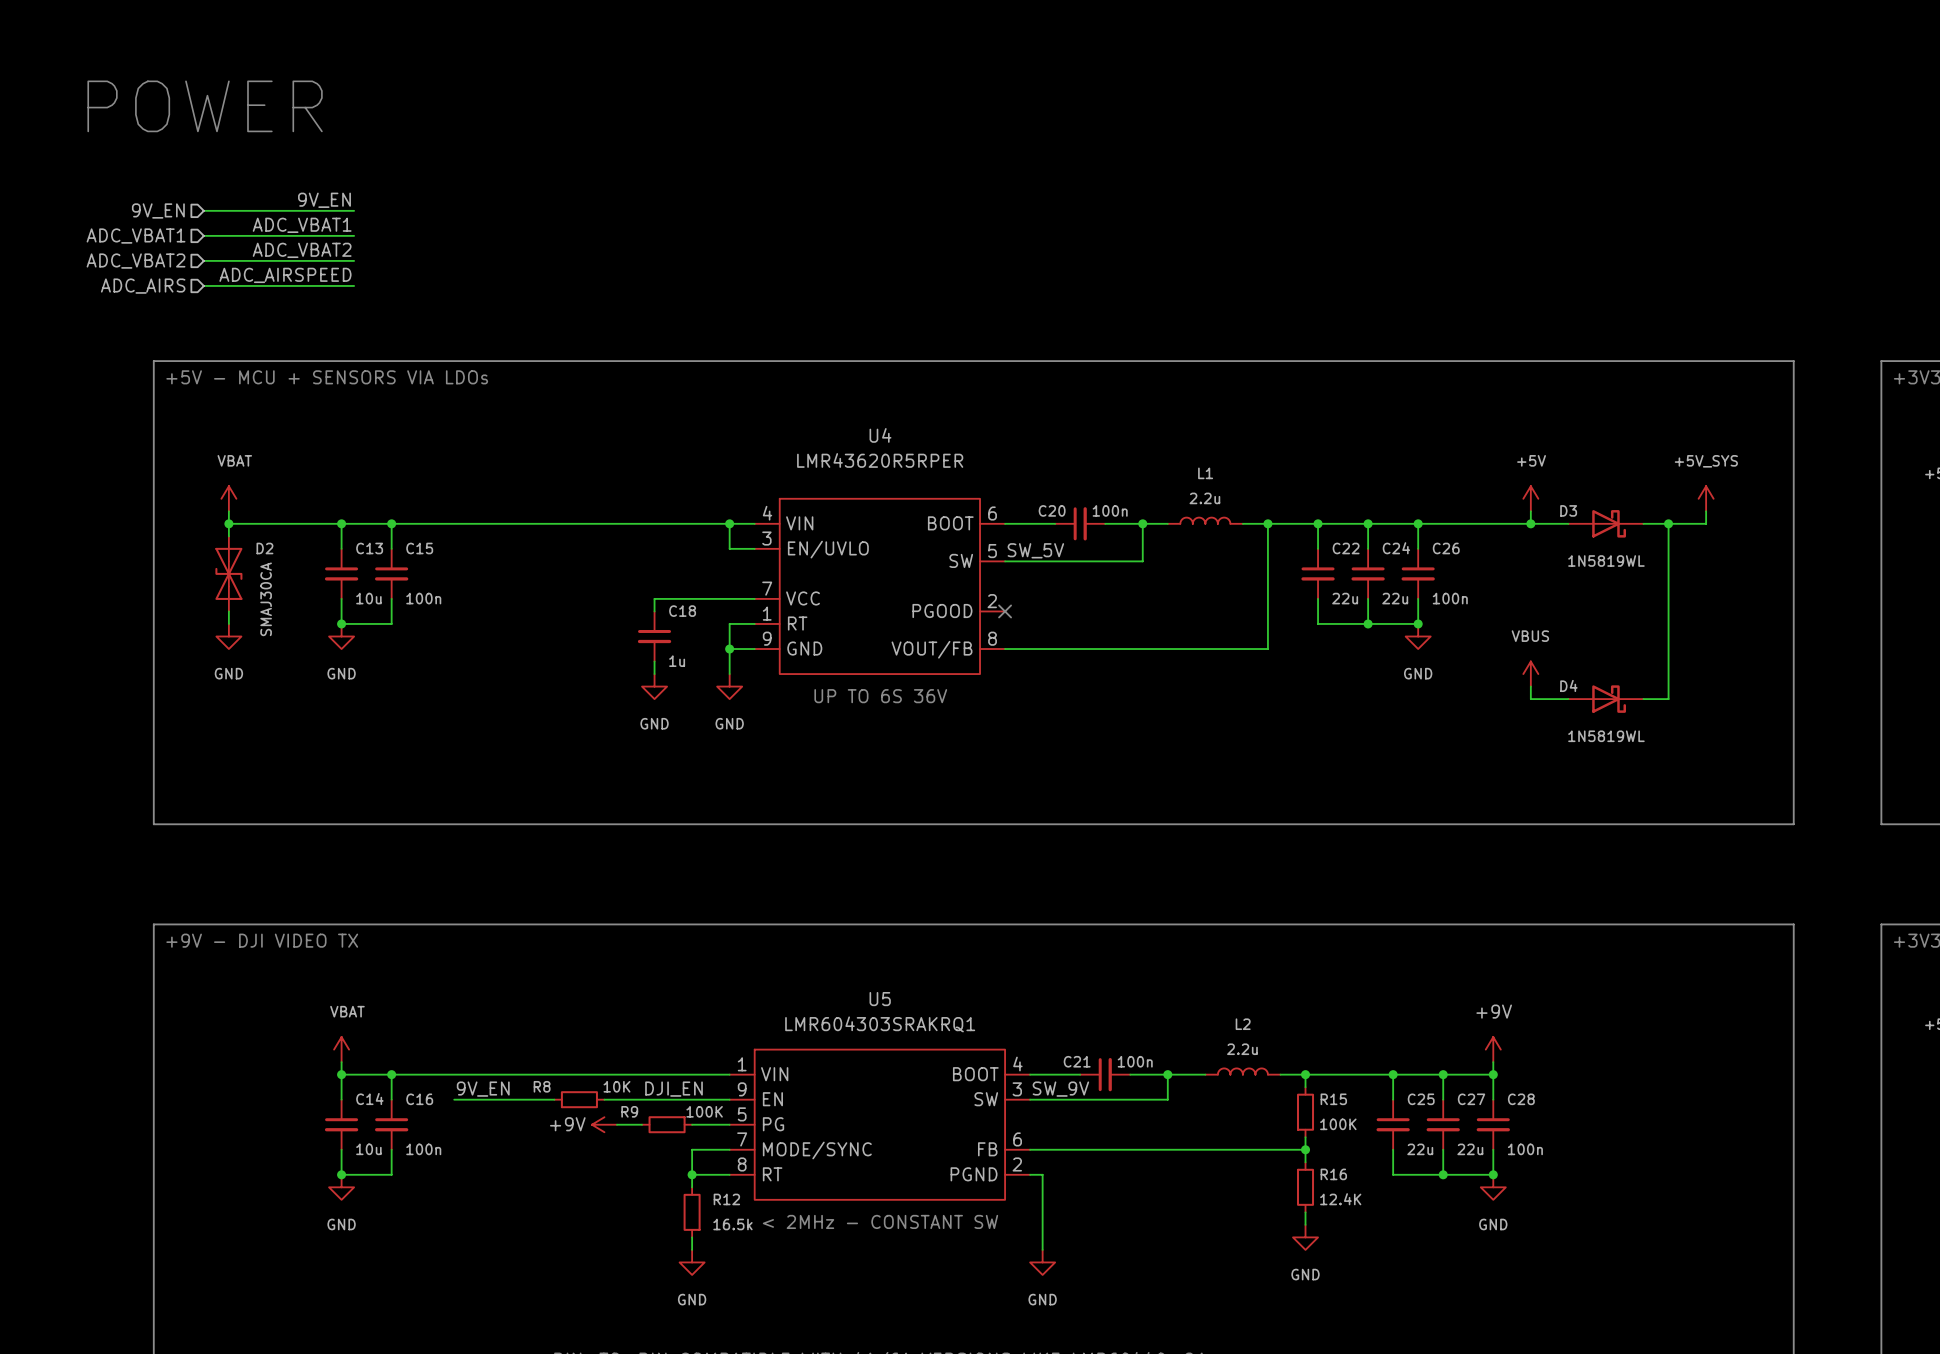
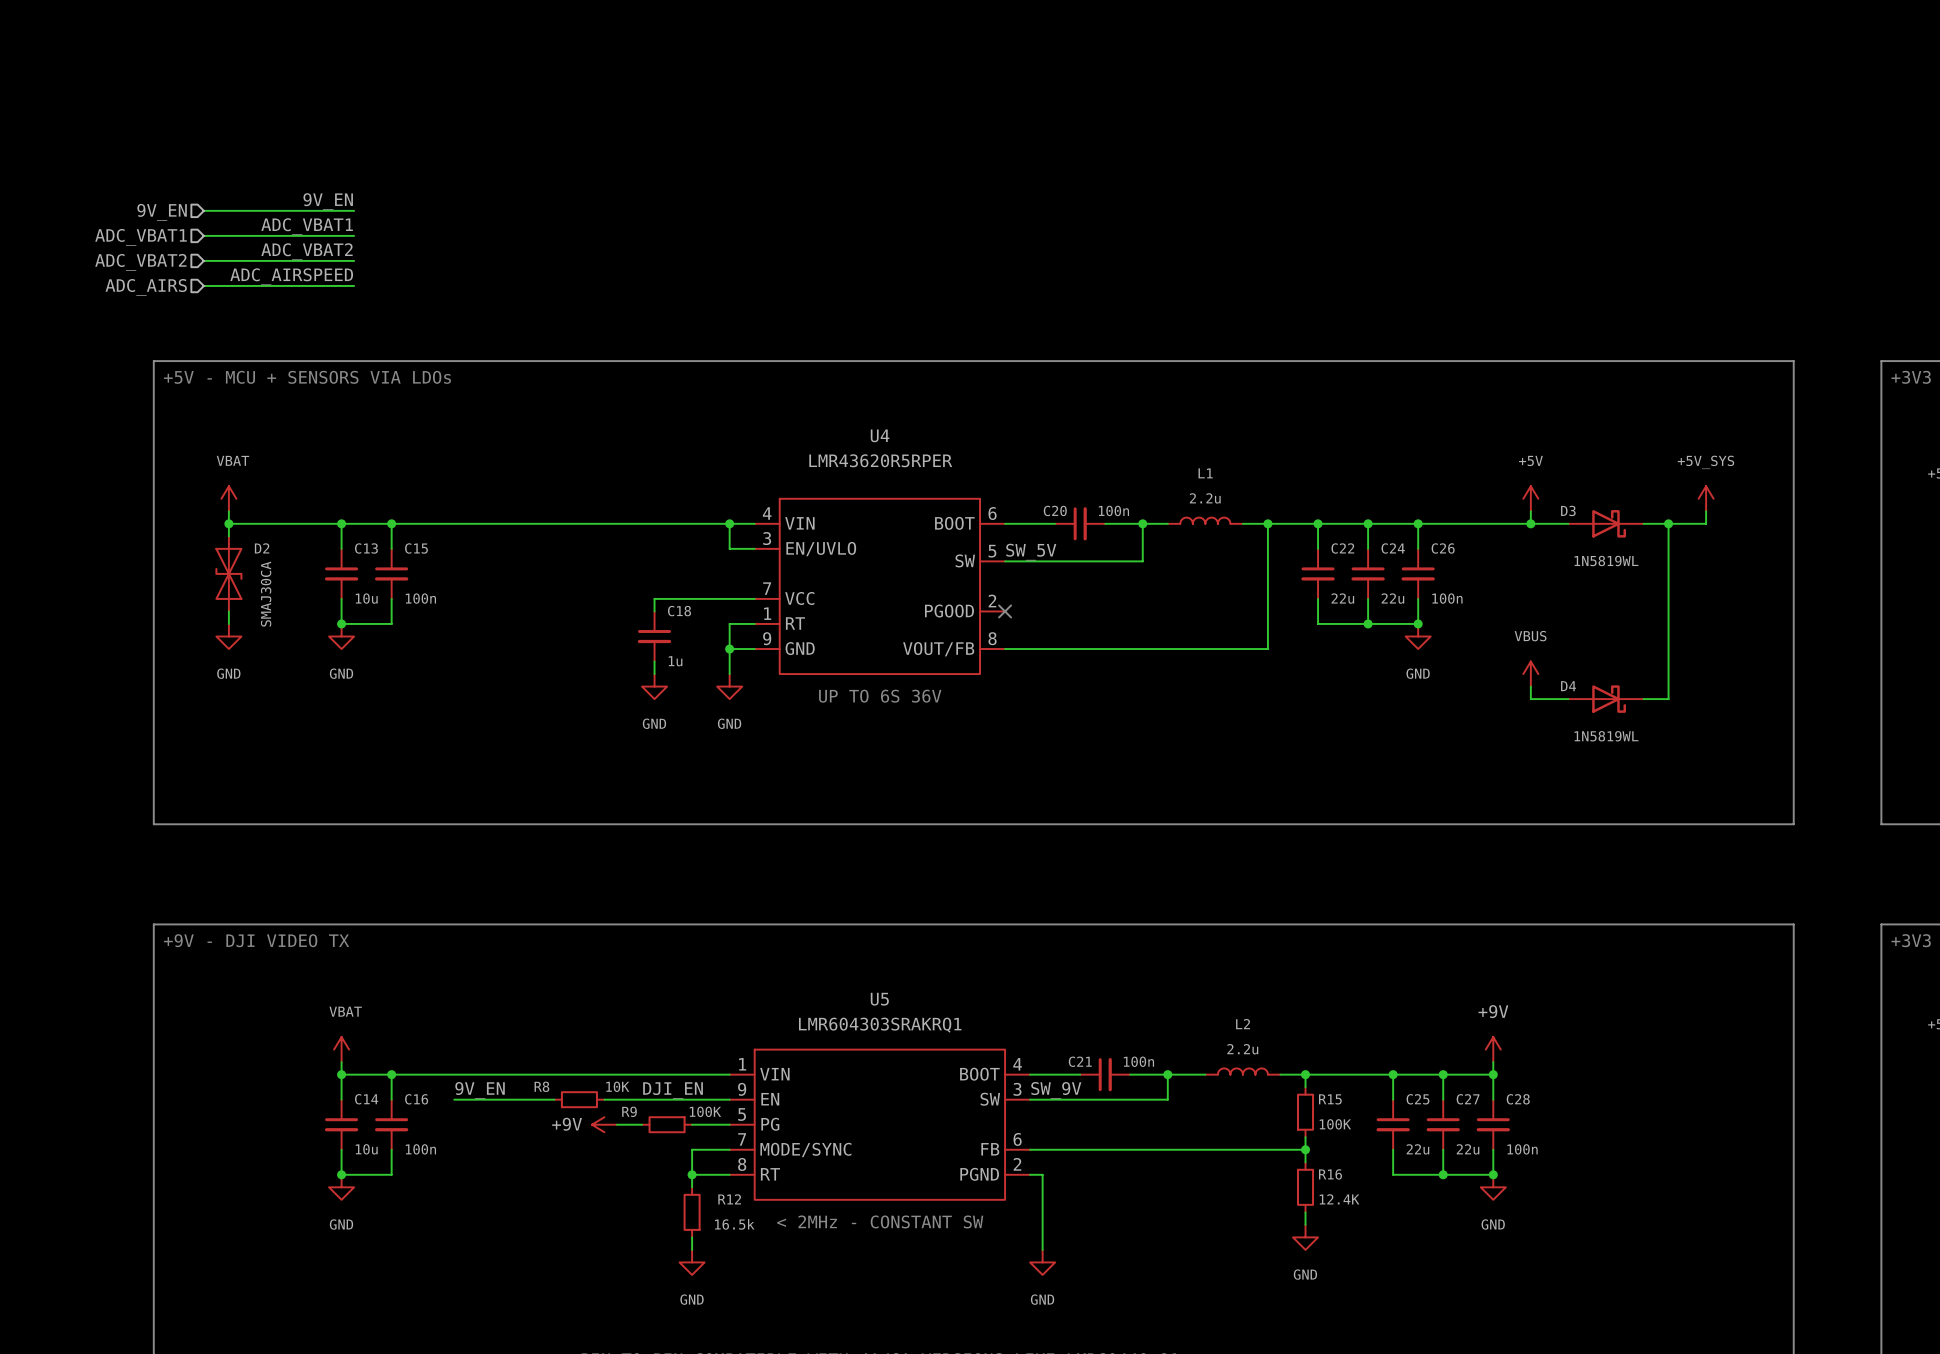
text: POWER (205, 106) -> none

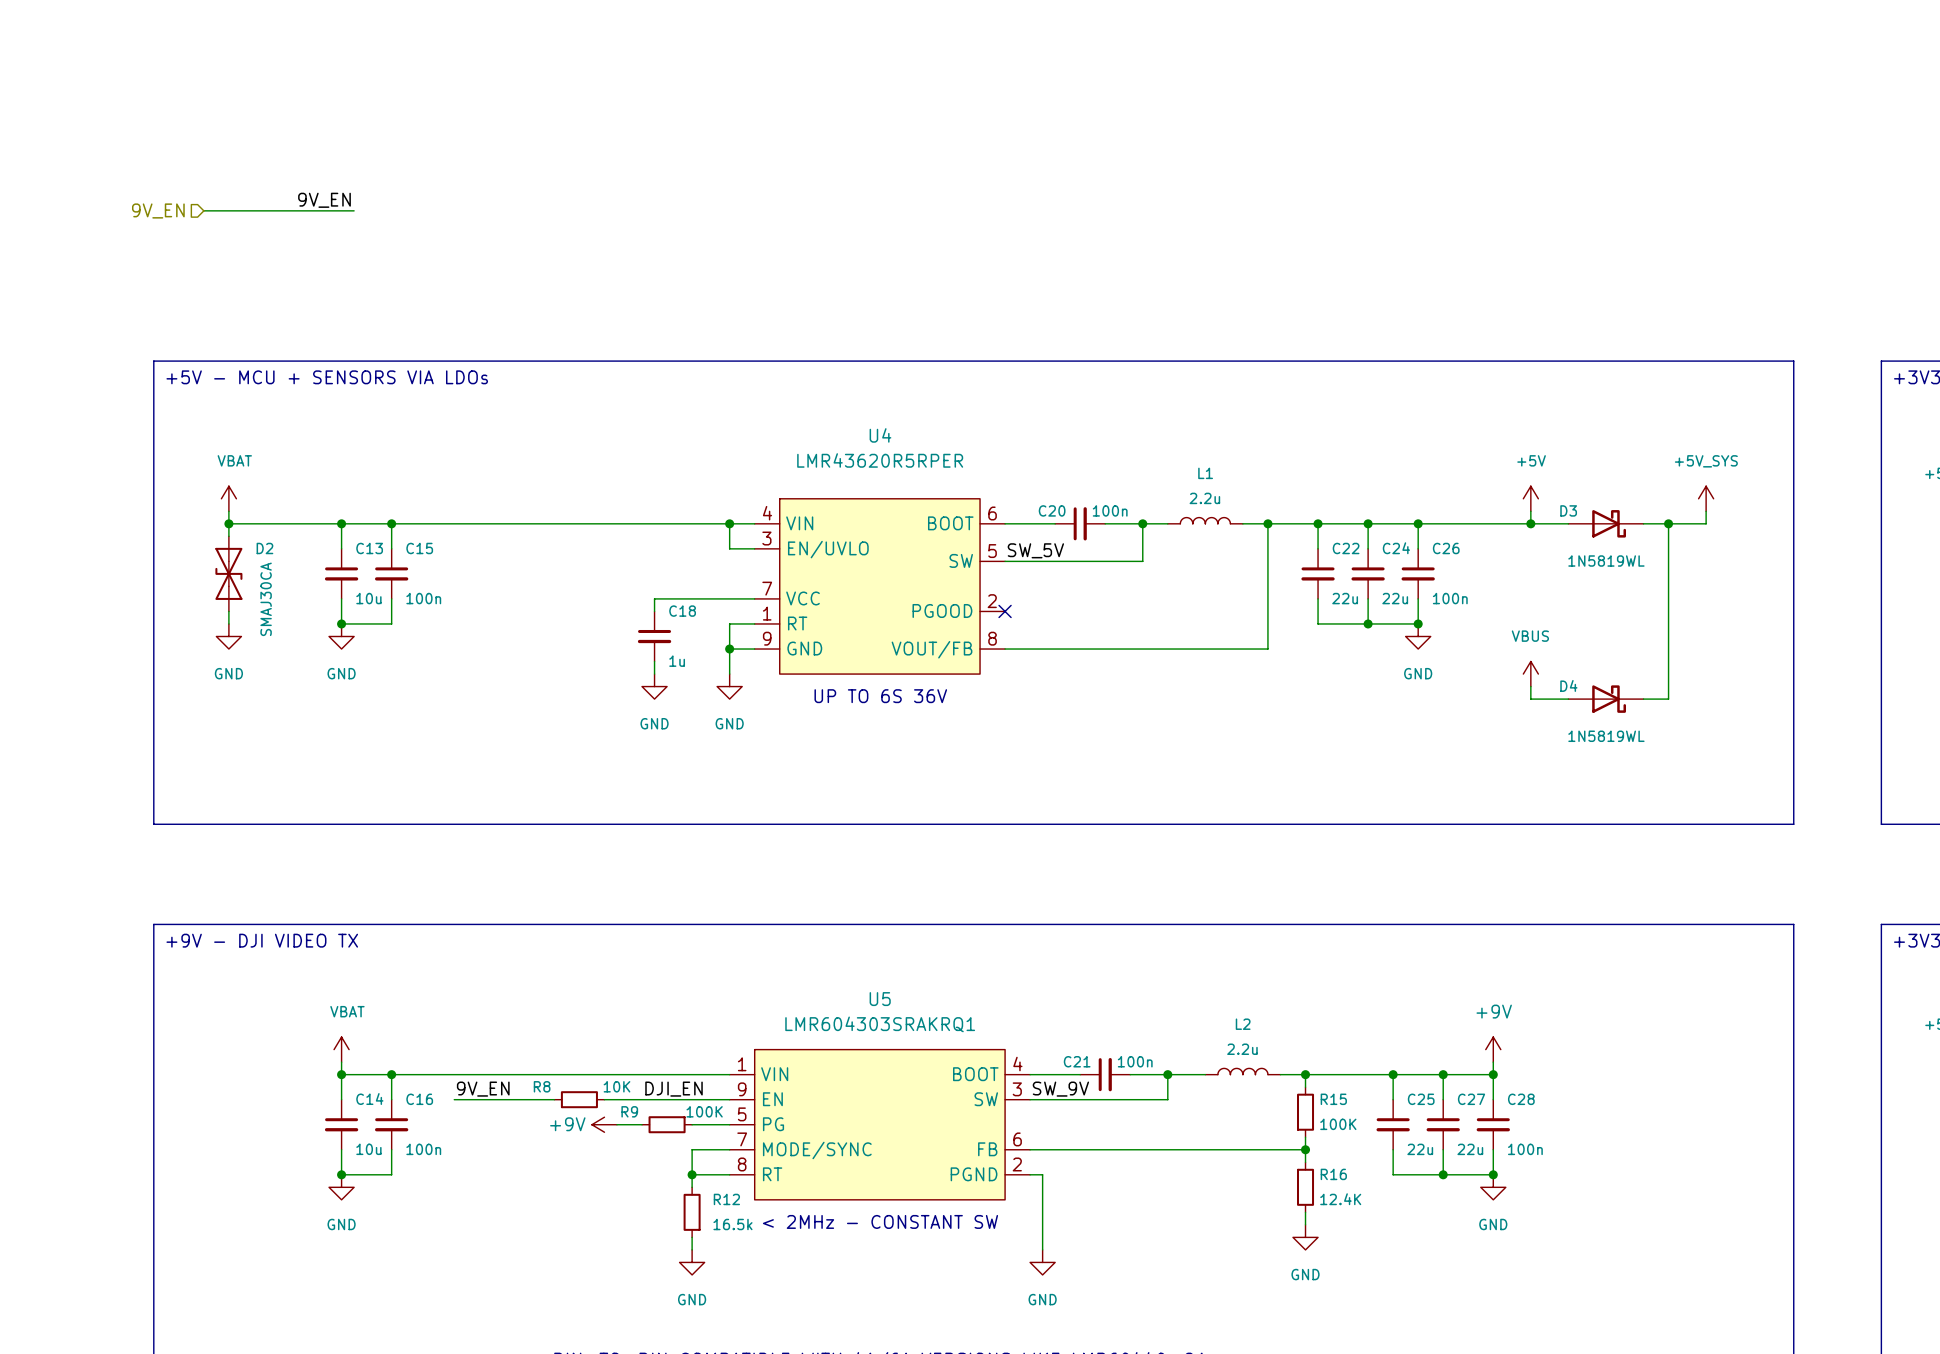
label: ADC_VBAT1 (307, 226) -> none
wire: (203, 235) (354, 235) -> none
hierarchical label: ADC_VBAT1 (141, 237) -> none
label: ADC_VBAT2 (307, 251) -> none
wire: (203, 260) (354, 260) -> none
hierarchical label: ADC_VBAT2 (140, 262) -> none
label: ADC_AIRSPEED (291, 276) -> none
wire: (203, 285) (354, 285) -> none
hierarchical label: ADC_AIRS (146, 287) -> none

